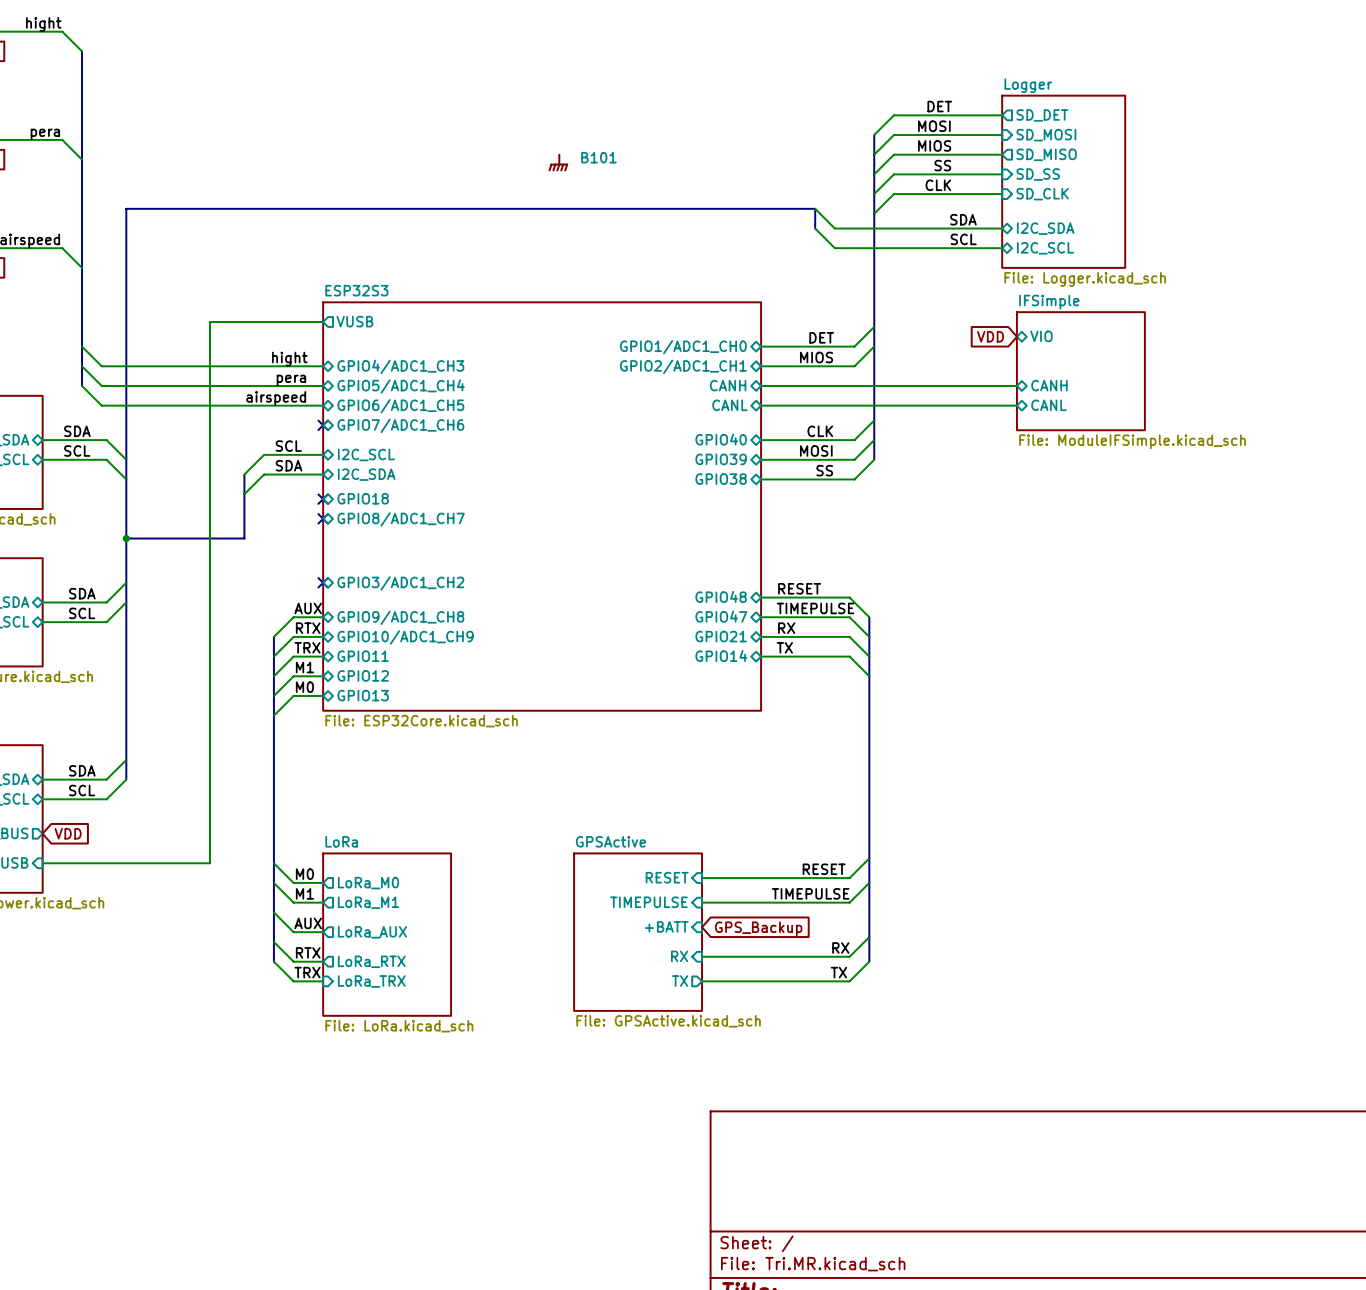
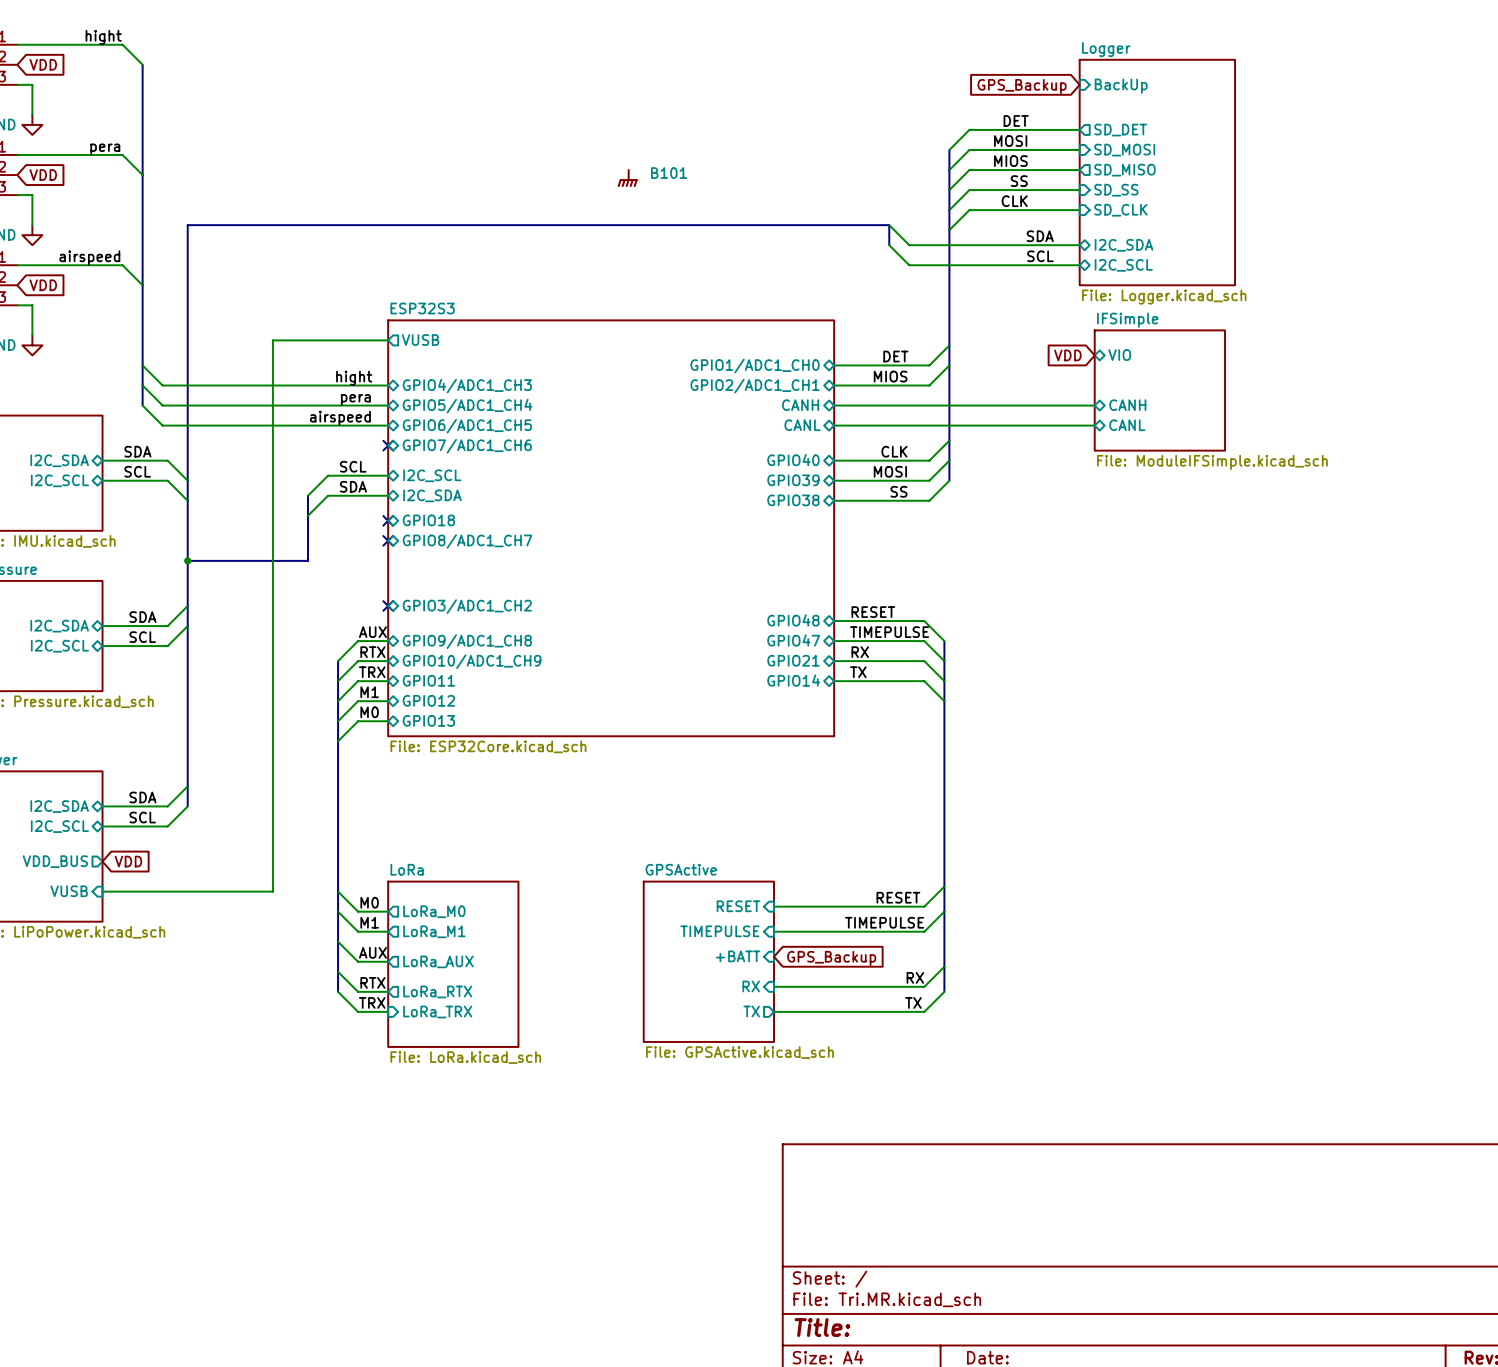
global label: none -> GPS_Backup (1022, 86)
sheet pin: none -> BackUp (1121, 86)
sheet Logger: none -> File: Logger.kicad_sch (1157, 172)
sheet Logger: File: Logger.kicad_sch (1063, 181) -> none

